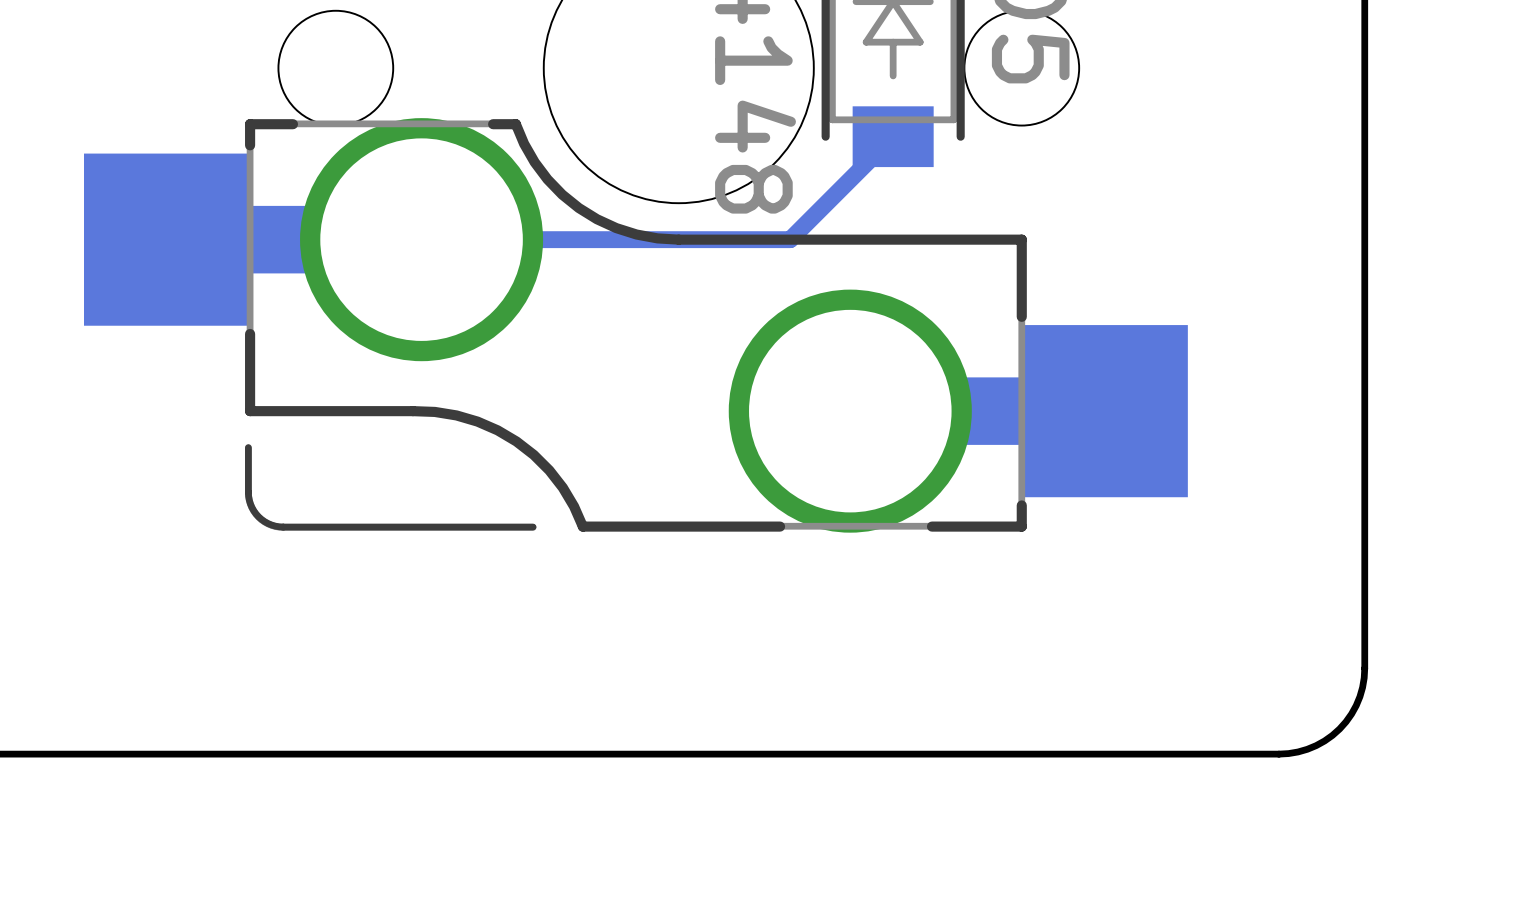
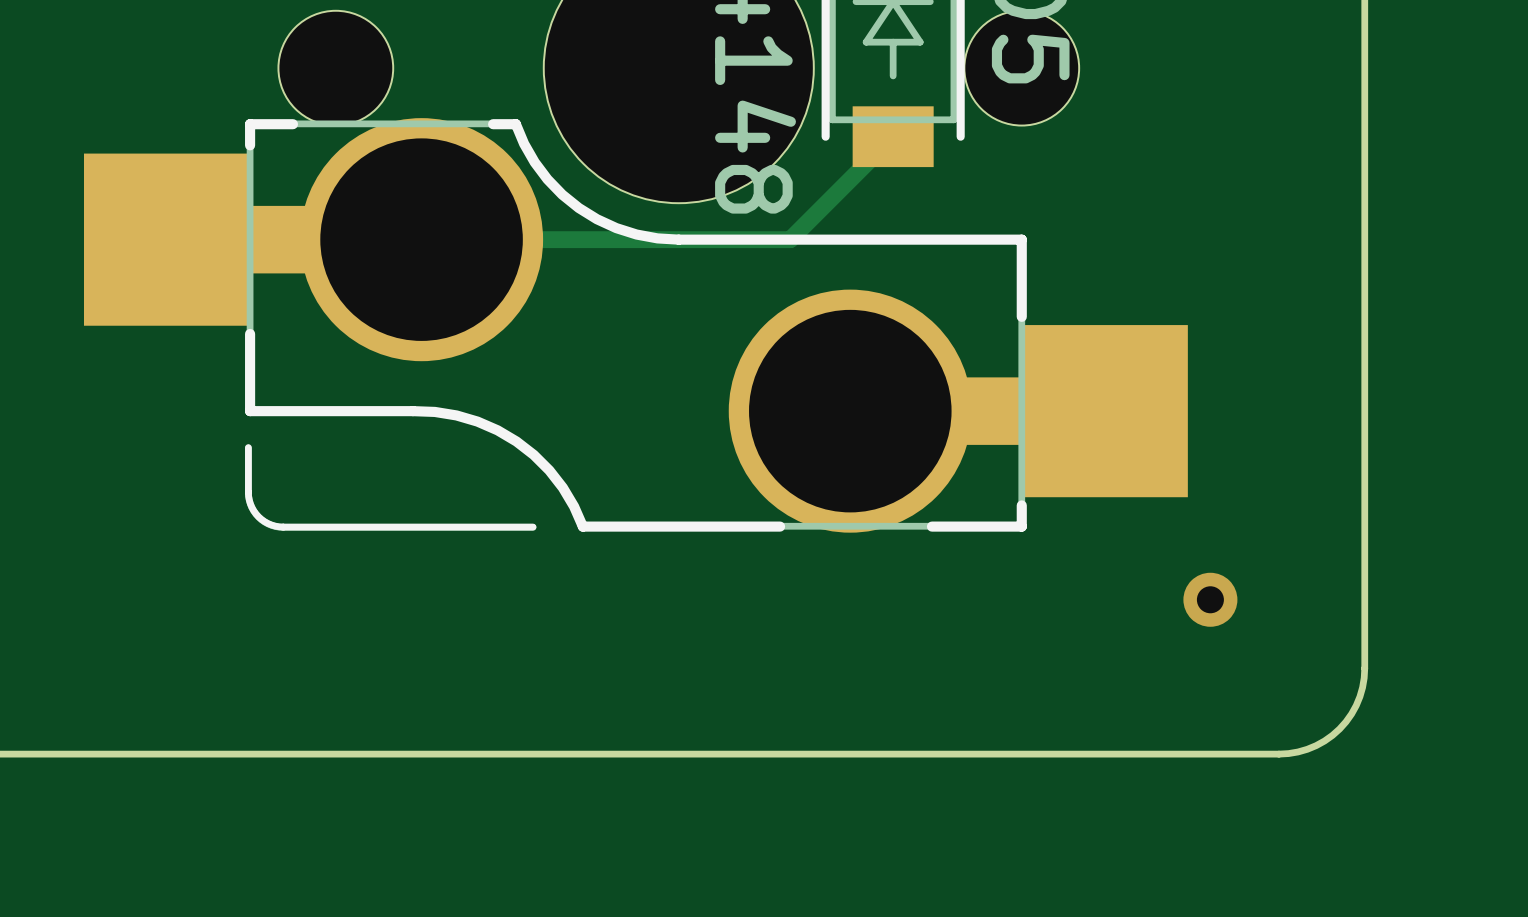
via: none -> (1210, 599)

